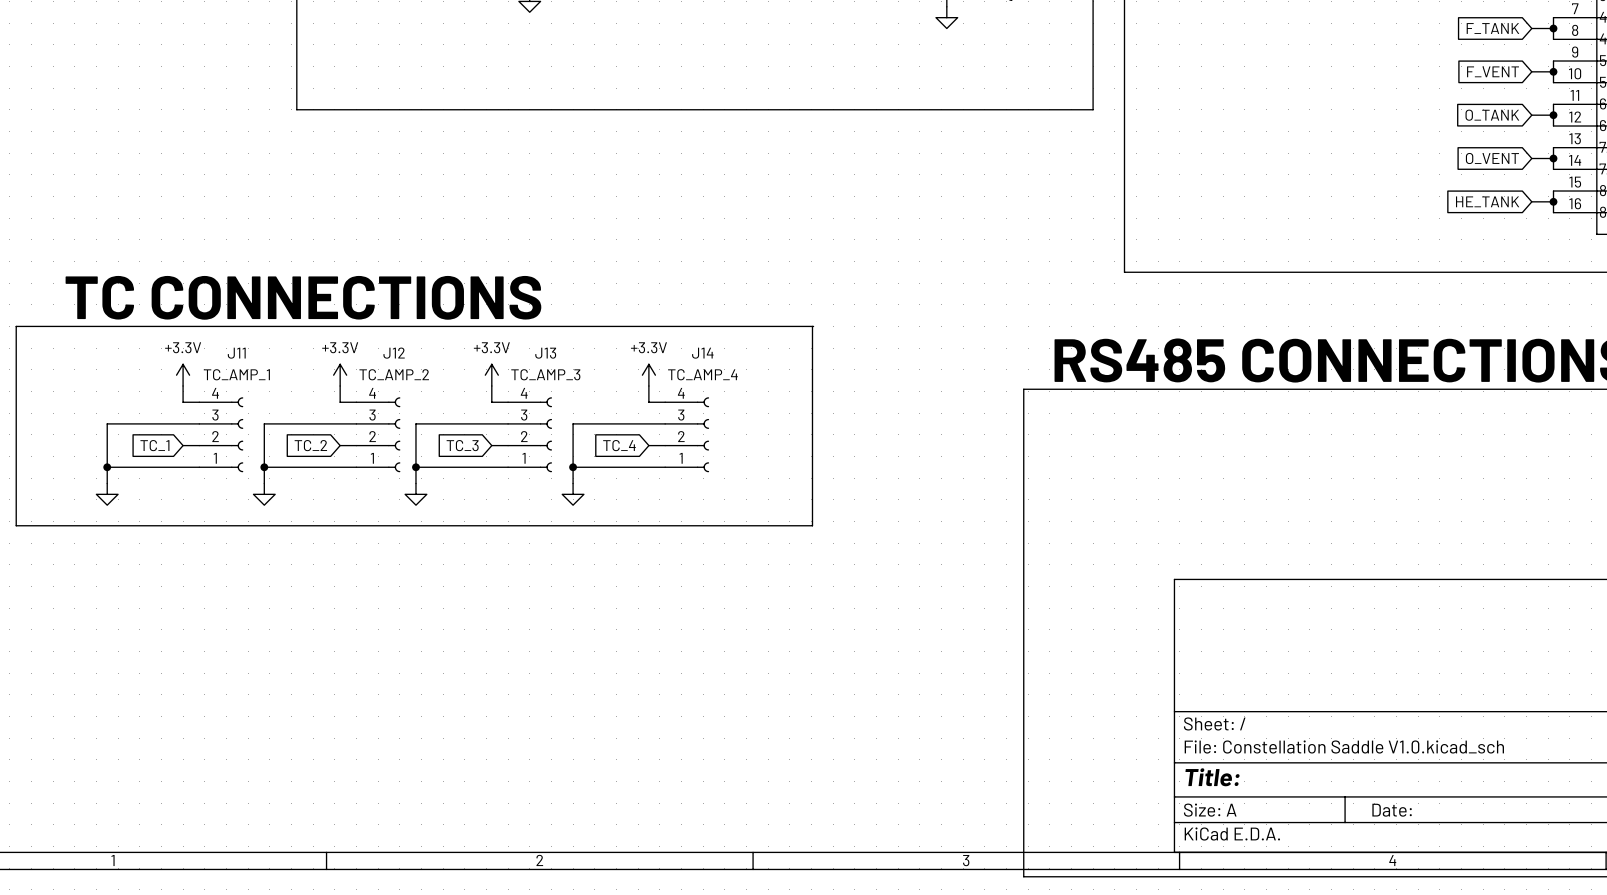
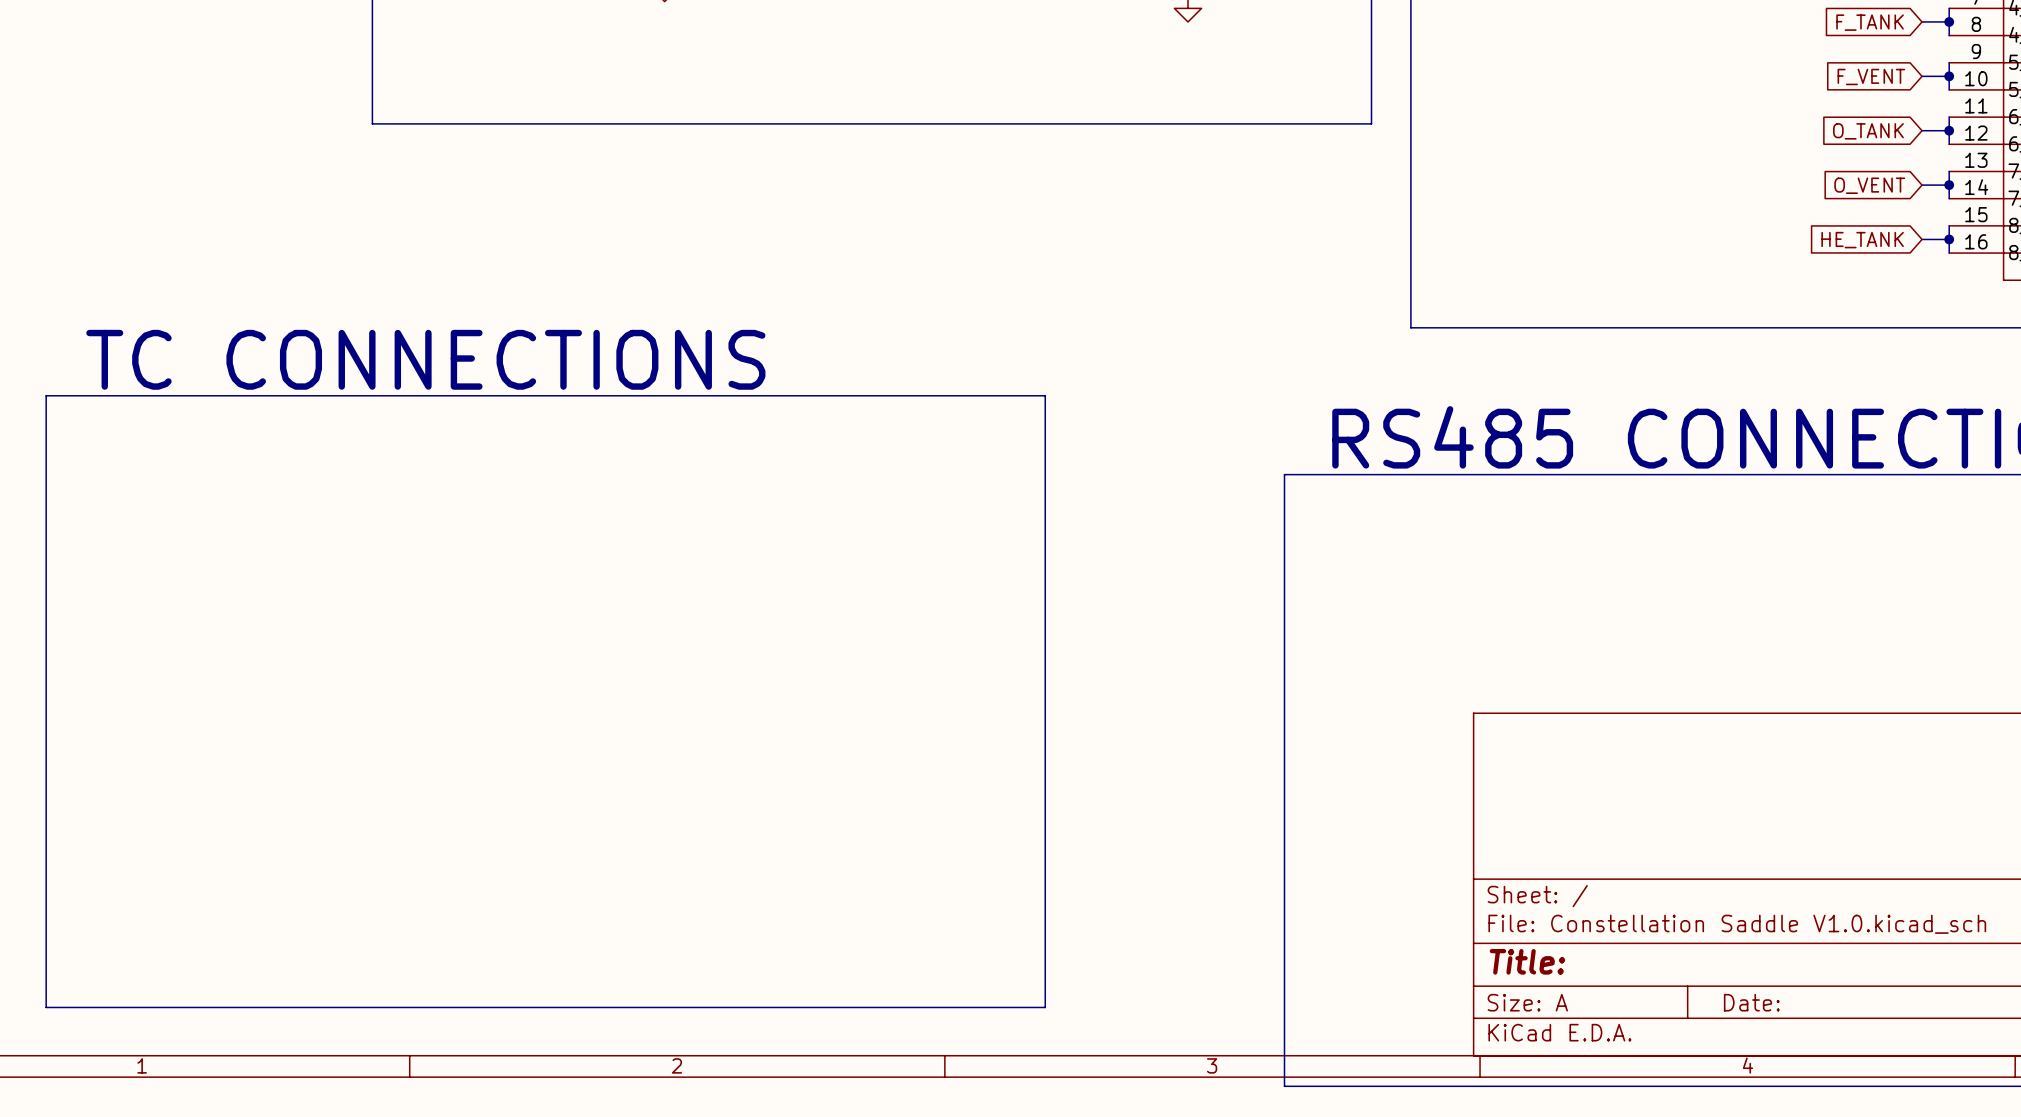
line: (36, 326) (16, 326) (16, 525) (812, 525) (812, 326) -> (46, 395) (46, 1007) (1045, 1007) (1045, 395) (1020, 395)
power symbol: +3.3V (183, 375) -> none
power symbol: +3.3V (340, 375) -> none
power symbol: +3.3V (491, 375) -> none
power symbol: +3.3V (648, 375) -> none
wire: (183, 386) (183, 402) (199, 402) -> none
wire: (340, 386) (340, 402) (356, 402) -> none
wire: (491, 386) (491, 402) (508, 402) -> none
wire: (648, 386) (648, 402) (665, 402) -> none
wire: (199, 423) (107, 423) (107, 483) -> none
wire: (356, 423) (264, 423) (264, 483) -> none
wire: (508, 423) (415, 423) (415, 483) -> none
wire: (665, 423) (573, 423) (573, 483) -> none
J11: TC_AMP_1 (221, 434) -> none
J12: TC_AMP_2 (378, 434) -> none
J13: TC_AMP_3 (530, 434) -> none
J14: TC_AMP_4 (687, 434) -> none
global label: TC_1 (154, 445) -> none
wire: (183, 445) (199, 445) -> none
global label: TC_2 (310, 445) -> none
wire: (340, 445) (356, 445) -> none
global label: TC_3 (462, 445) -> none
wire: (491, 445) (508, 445) -> none
global label: TC_4 (619, 445) -> none
wire: (648, 445) (665, 445) -> none
wire: (107, 467) (199, 467) -> none
junction: (107, 467) -> none
wire: (264, 467) (356, 467) -> none
junction: (264, 467) -> none
wire: (415, 467) (508, 467) -> none
junction: (415, 467) -> none
wire: (573, 467) (665, 467) -> none
junction: (573, 467) -> none
power symbol: (107, 494) -> none
power symbol: (264, 494) -> none
power symbol: (415, 494) -> none
power symbol: (573, 494) -> none

